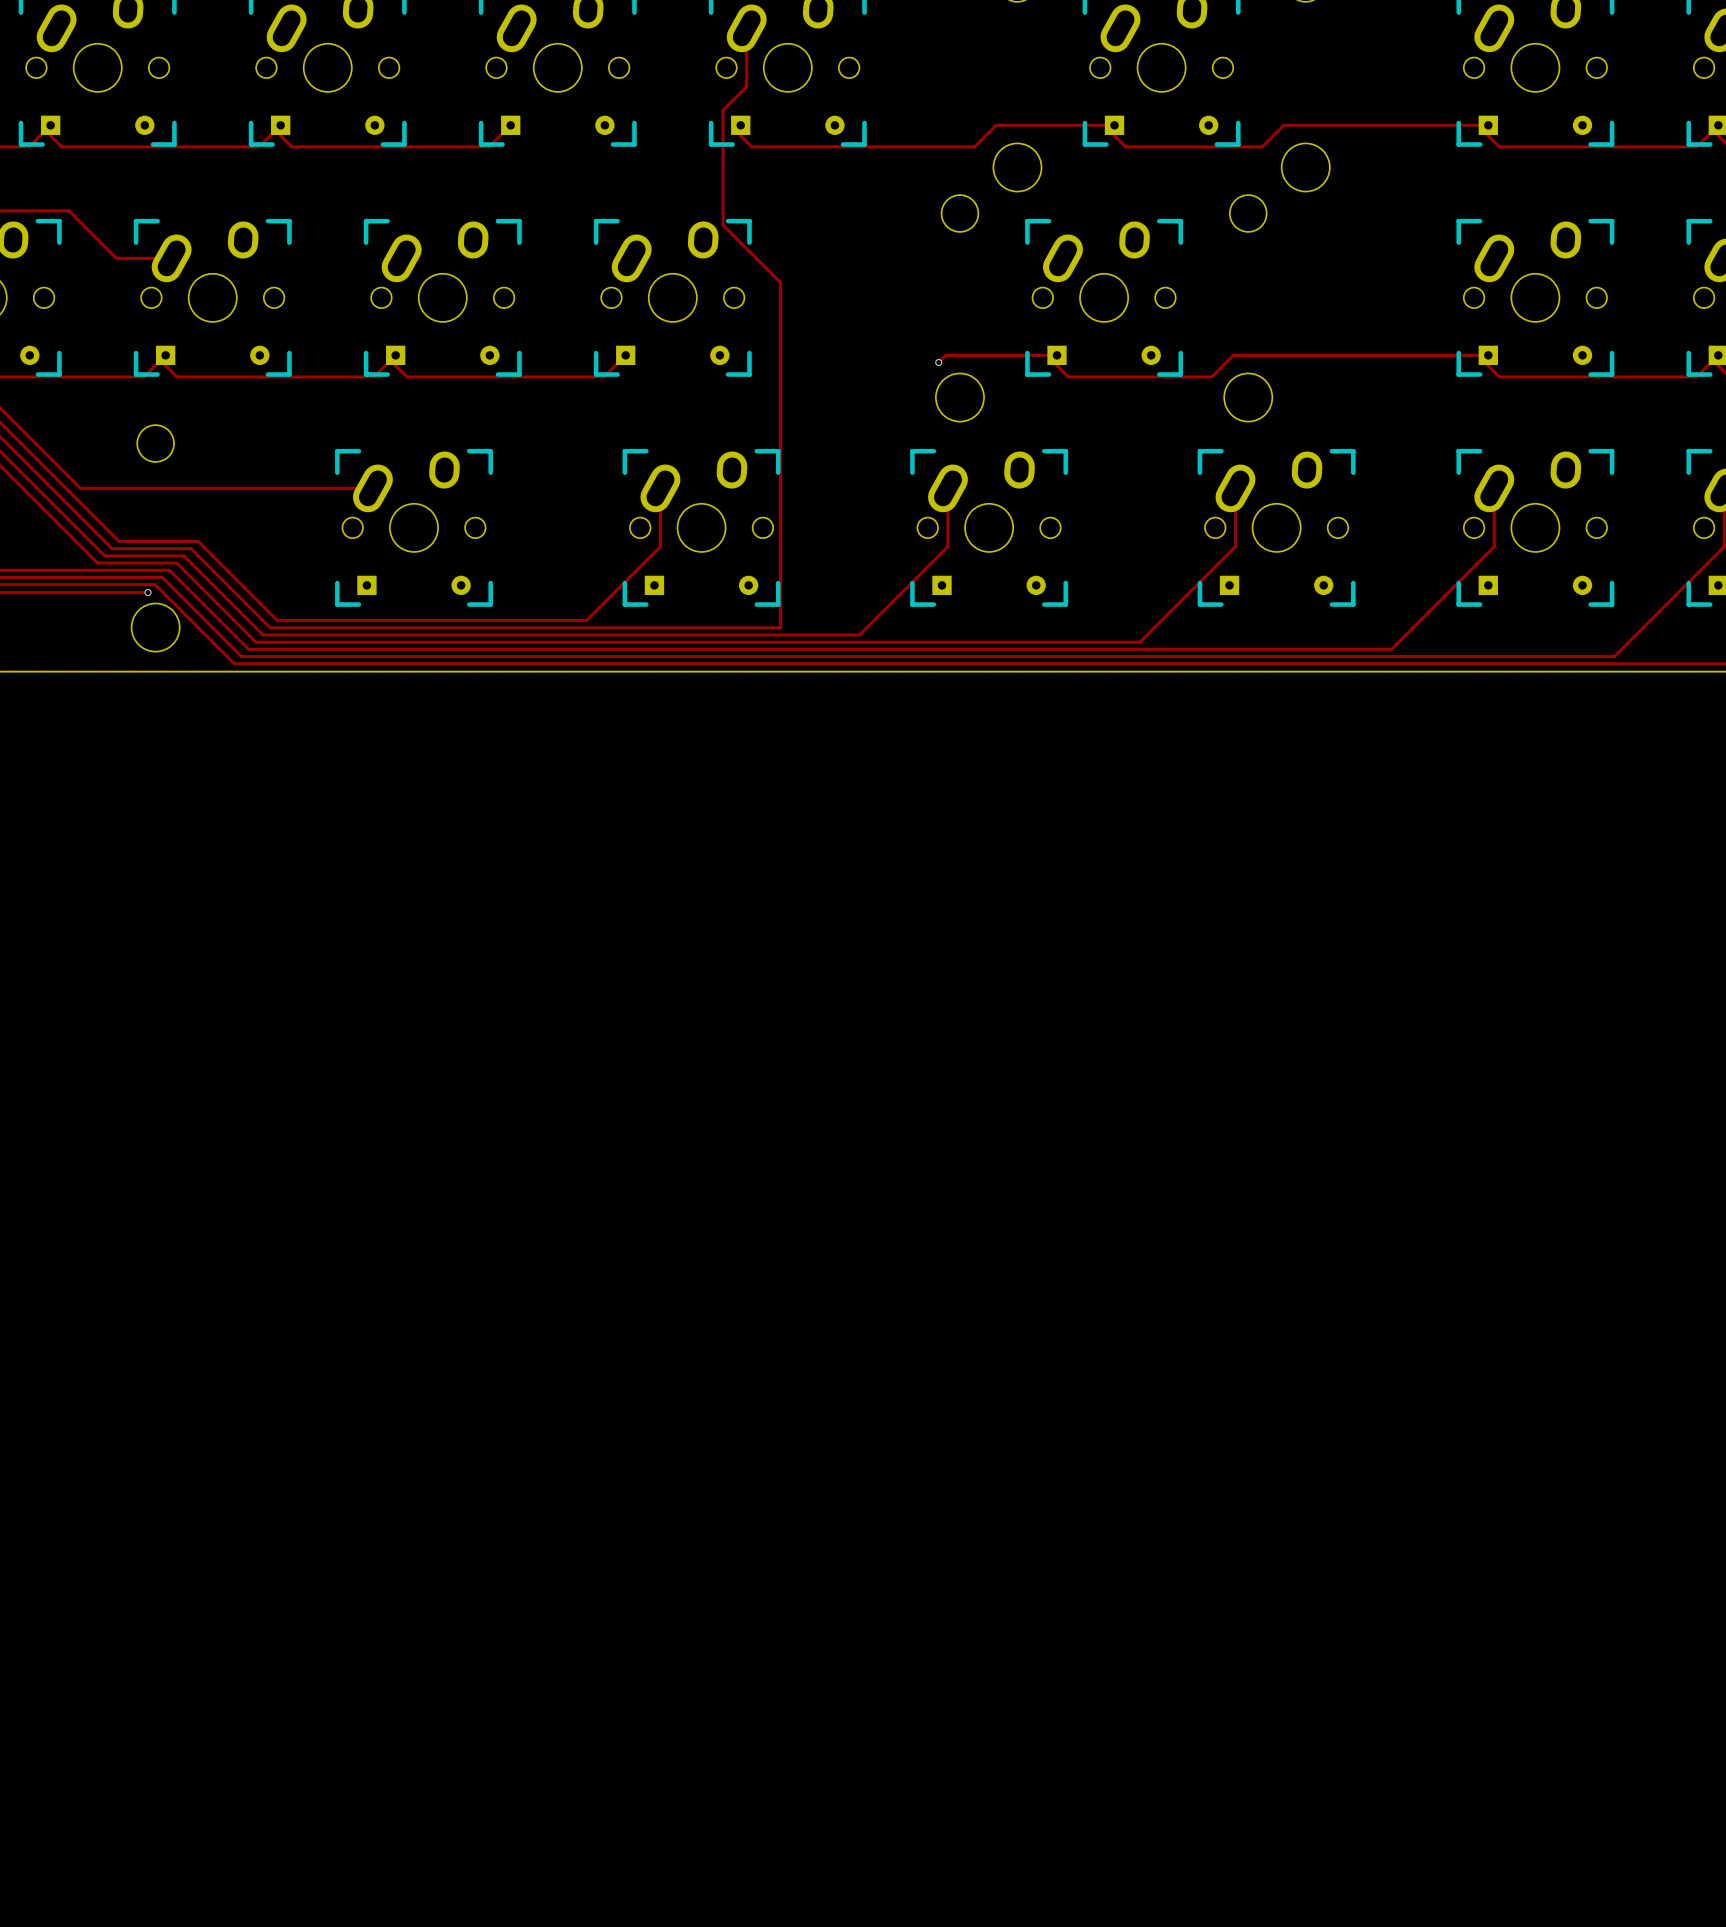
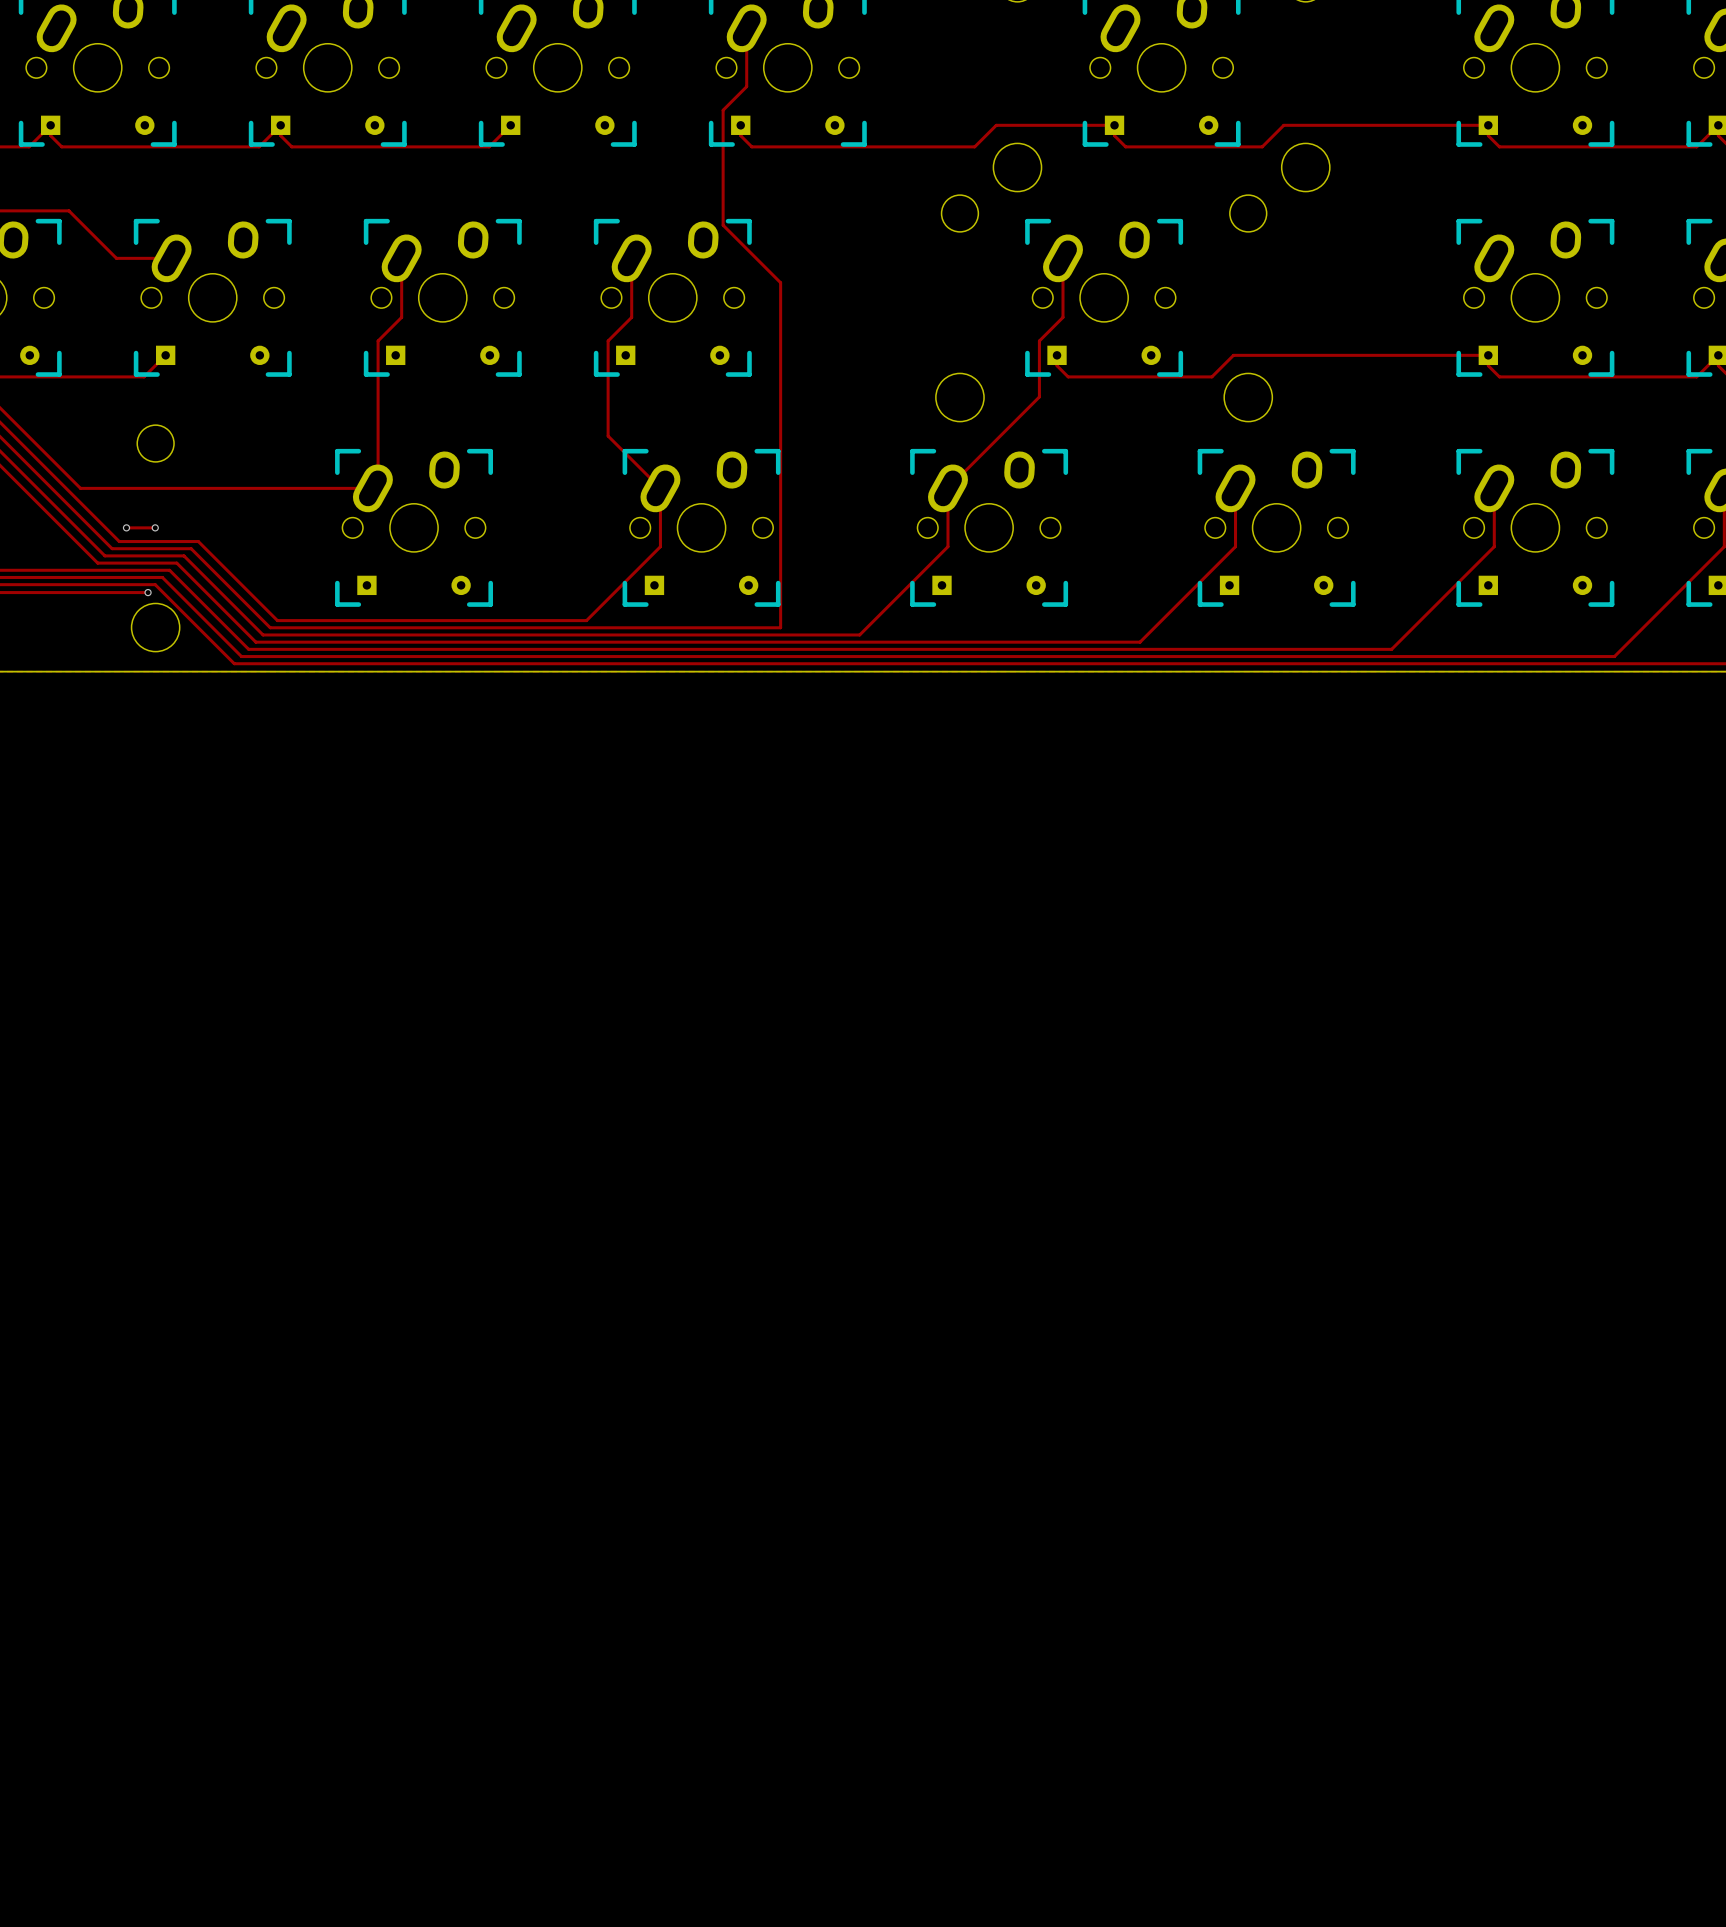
track: none -> (401, 258) (401, 317) (378, 340) (378, 483) (372, 488)
track: none -> (631, 258) (631, 317) (608, 340) (608, 436) (660, 488)
track: none -> (1062, 258) (1062, 317) (1039, 340) (1039, 396) (947, 488)
track: (165, 355) (165, 365) (176, 376) (374, 376) (395, 355) (395, 365) (406, 376) (604, 376) (625, 355) -> none
track: (1057, 355) (945, 355) (938, 362) -> none
via: (938, 362) -> none
track: none -> (126, 527) (155, 527)
via: none -> (126, 527)
via: none -> (155, 527)

